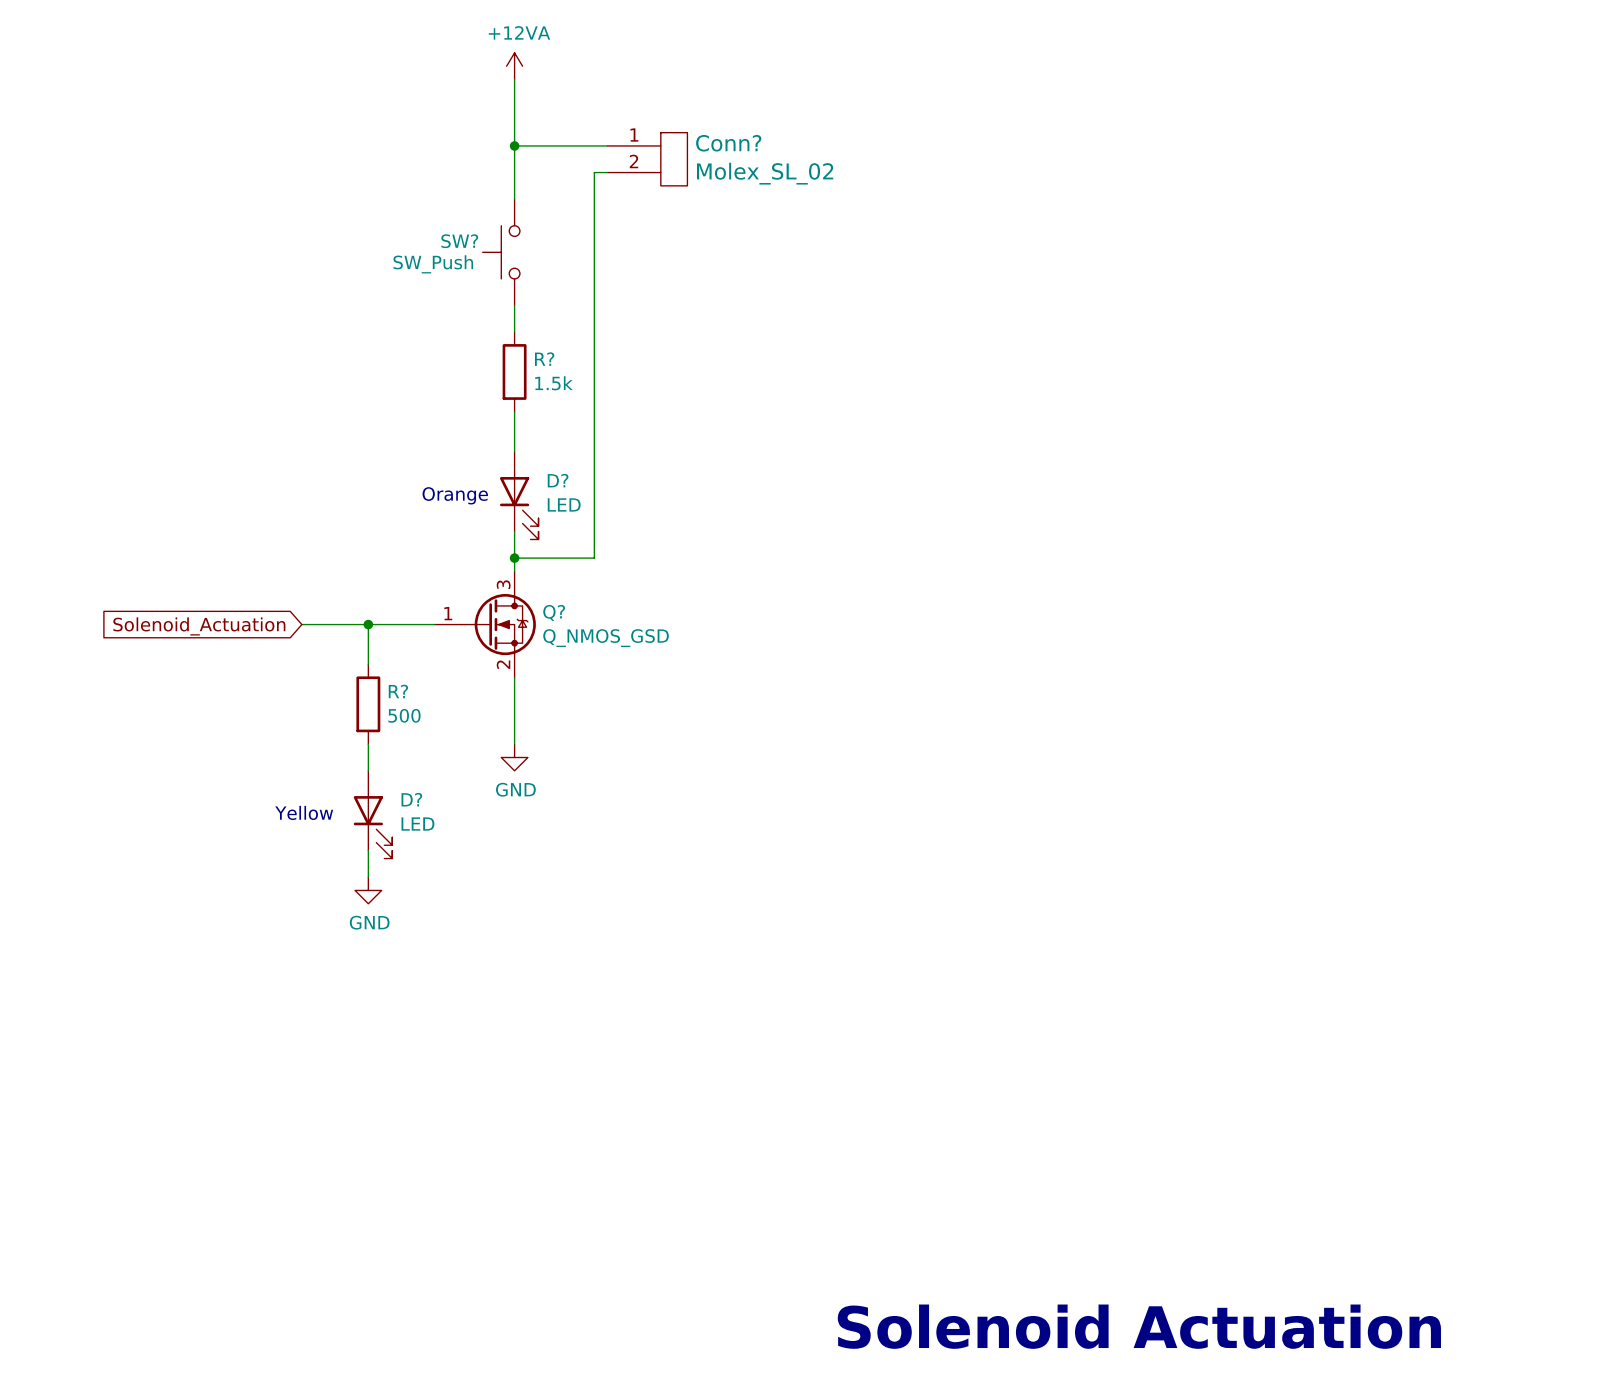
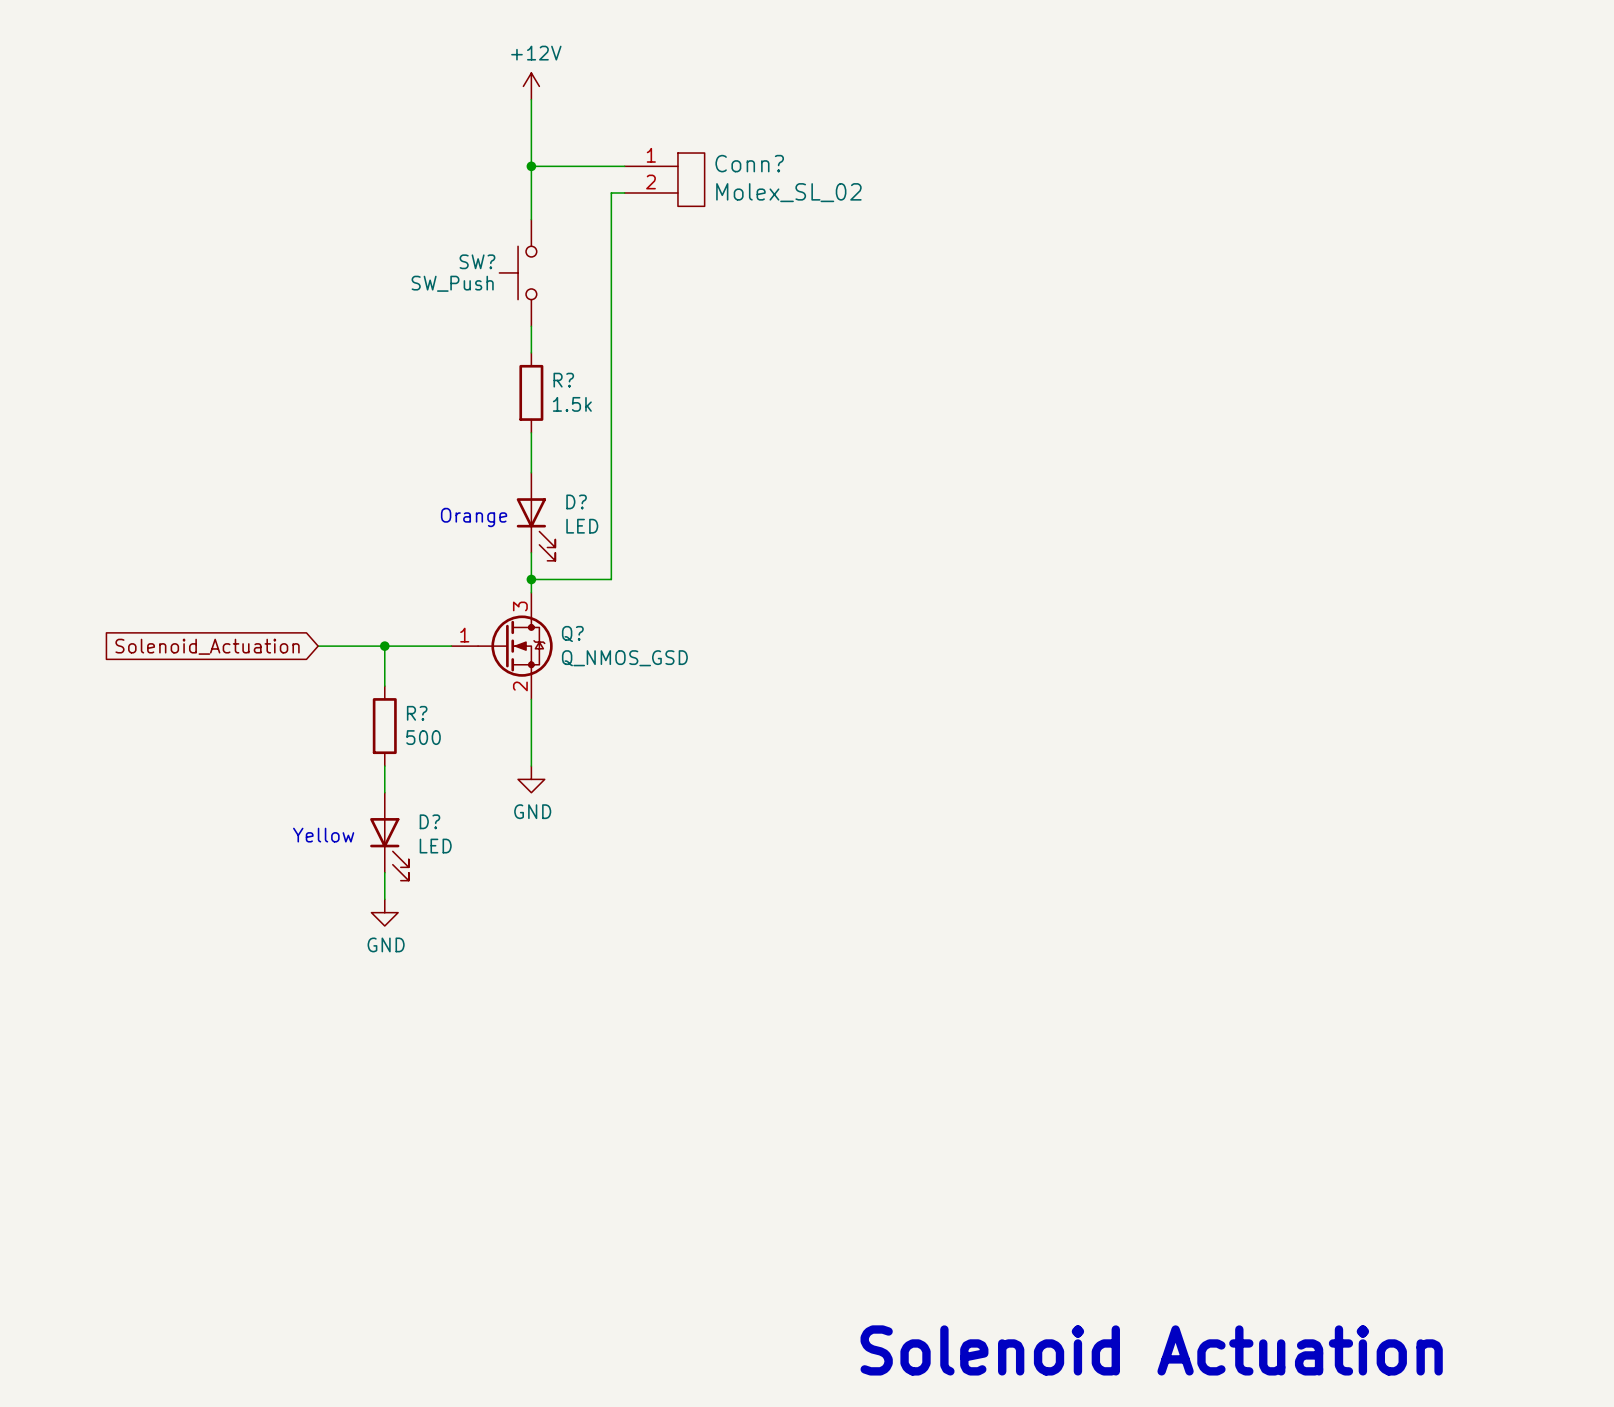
power symbol: +12VA (514, 66) -> +12V (531, 86)

